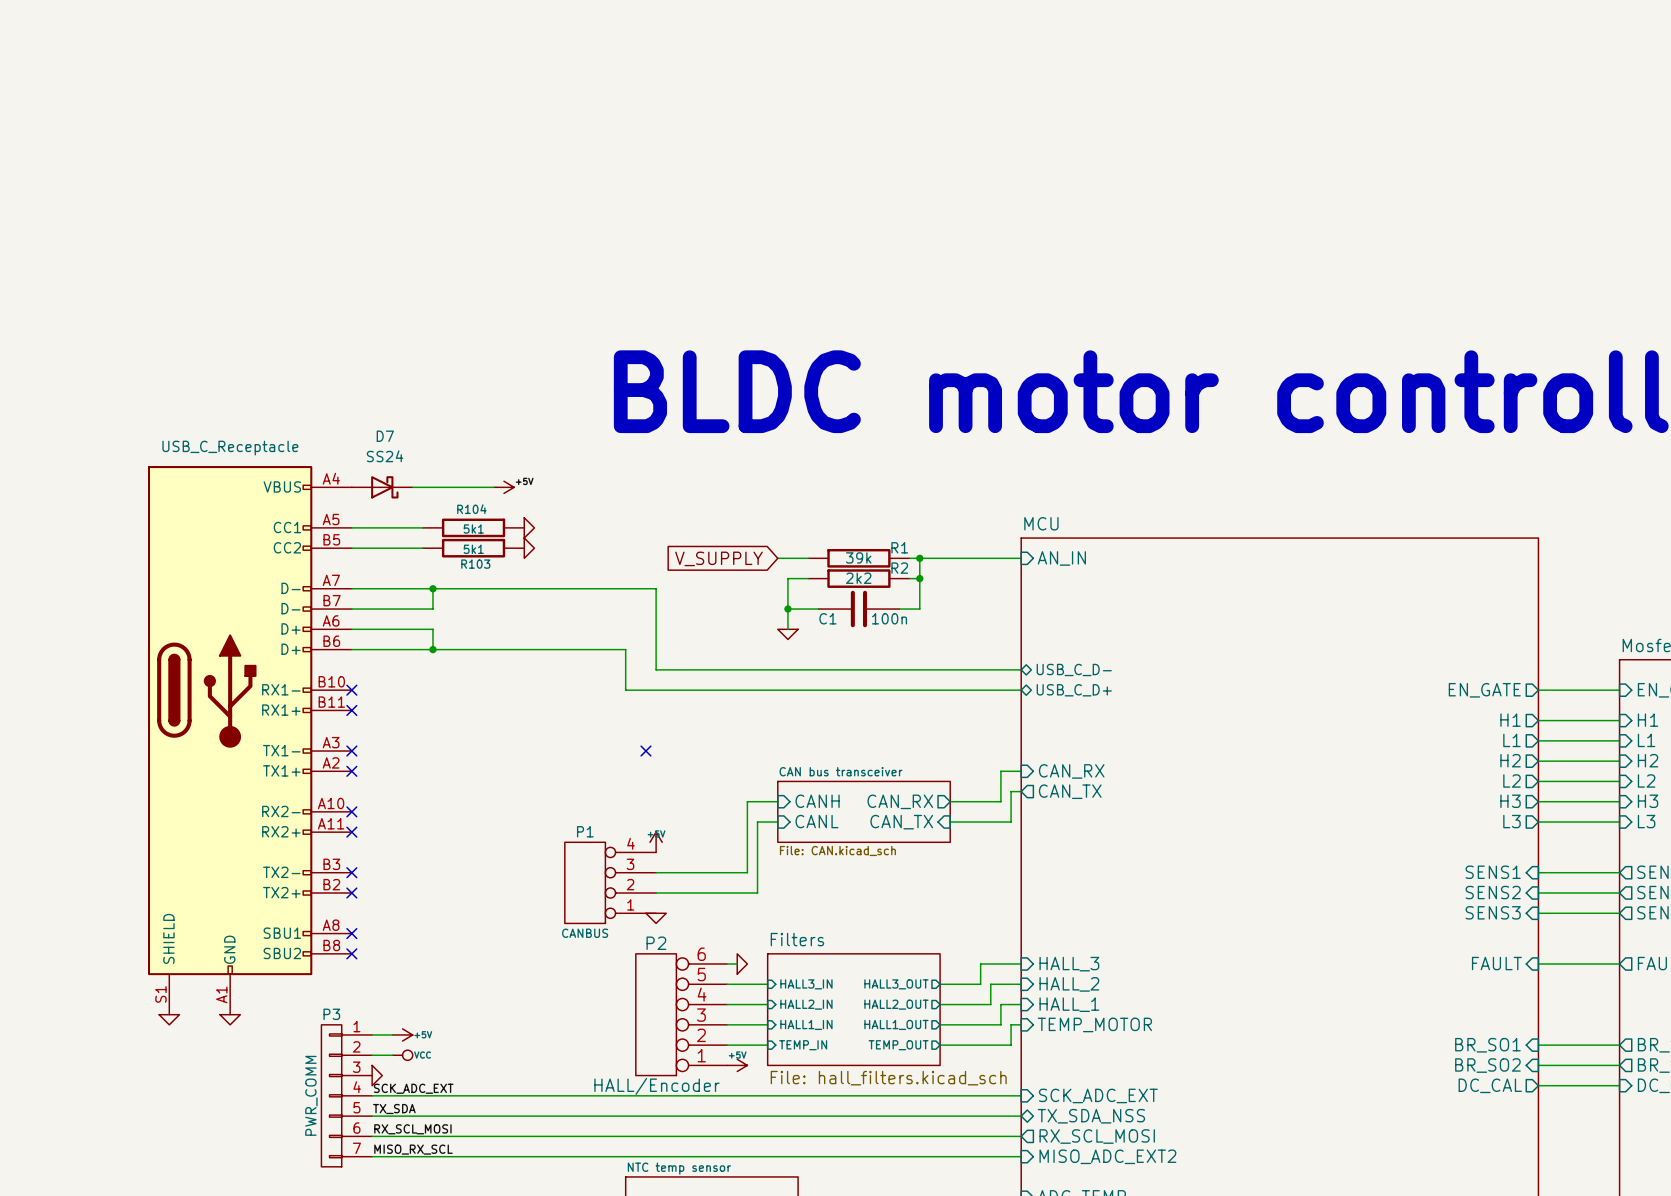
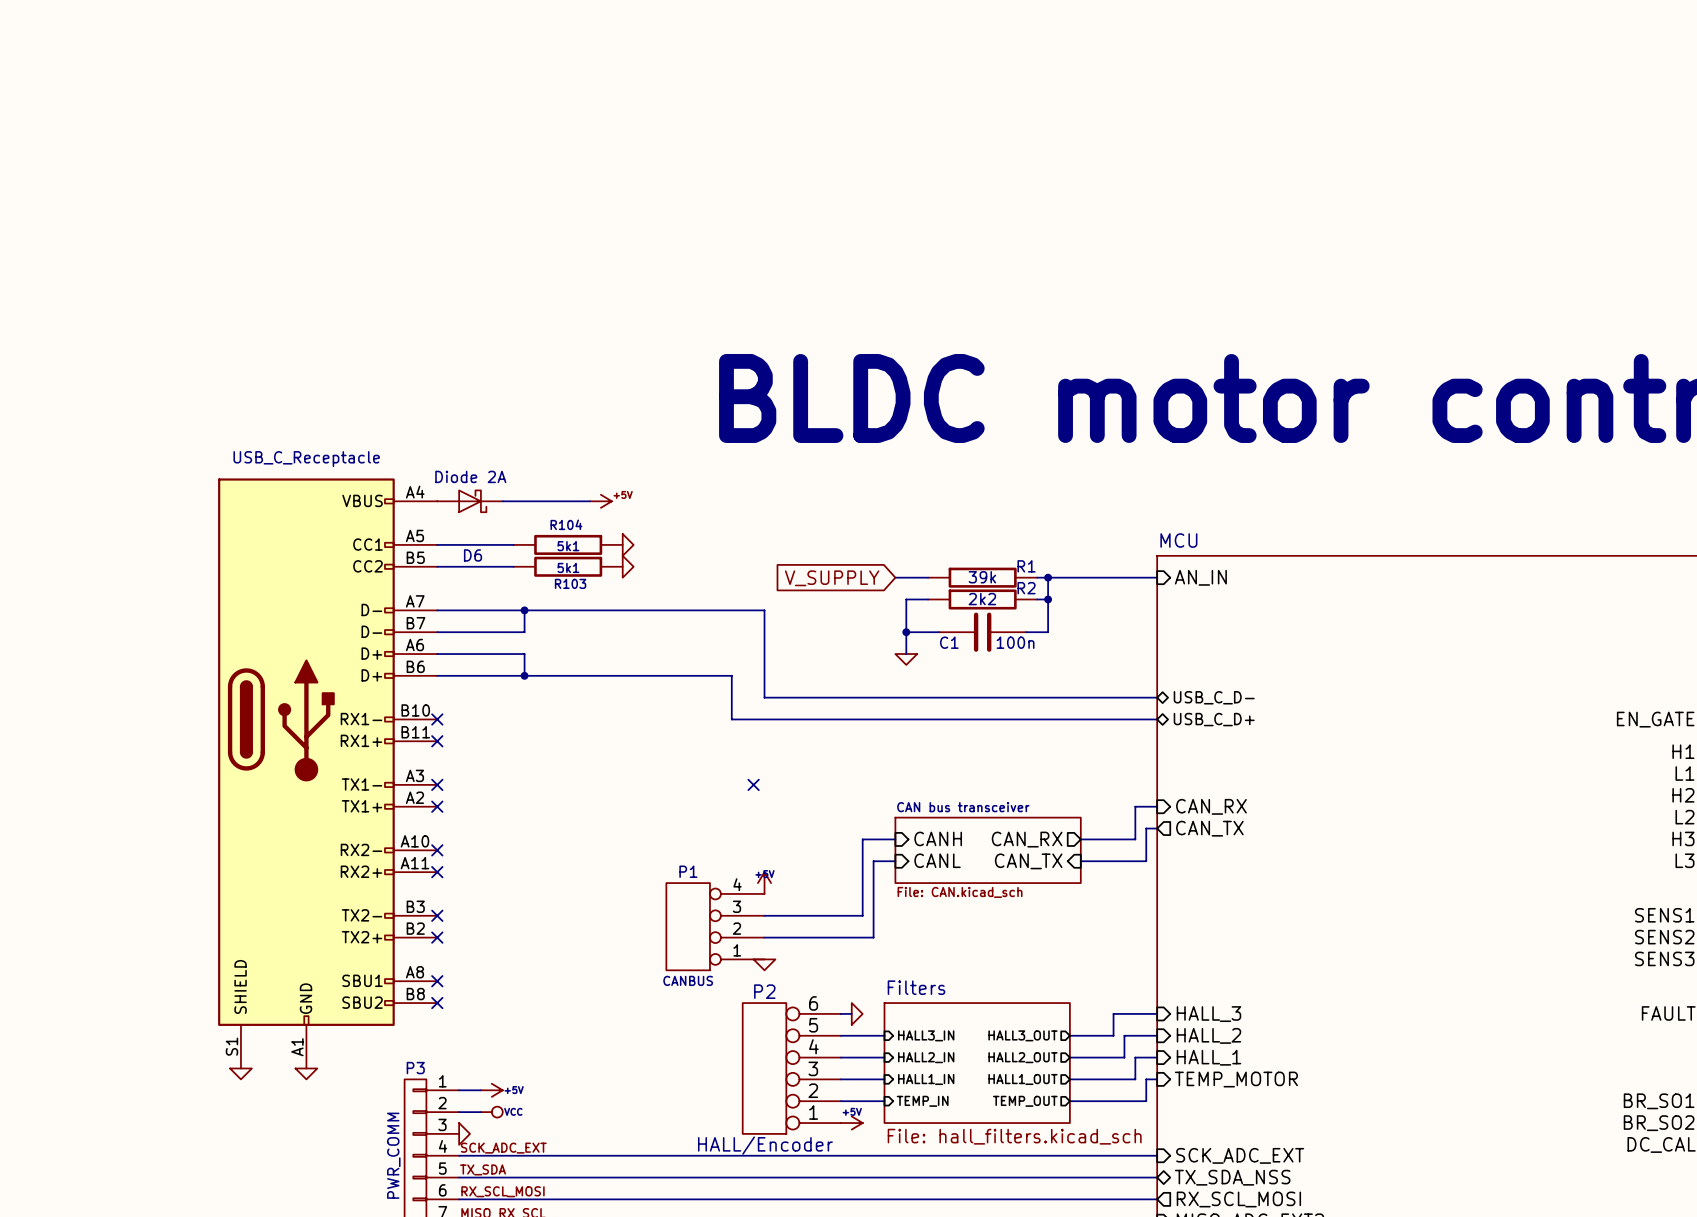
D7: SS24 (382, 487) -> none
D6: none -> Diode 2A (470, 501)

